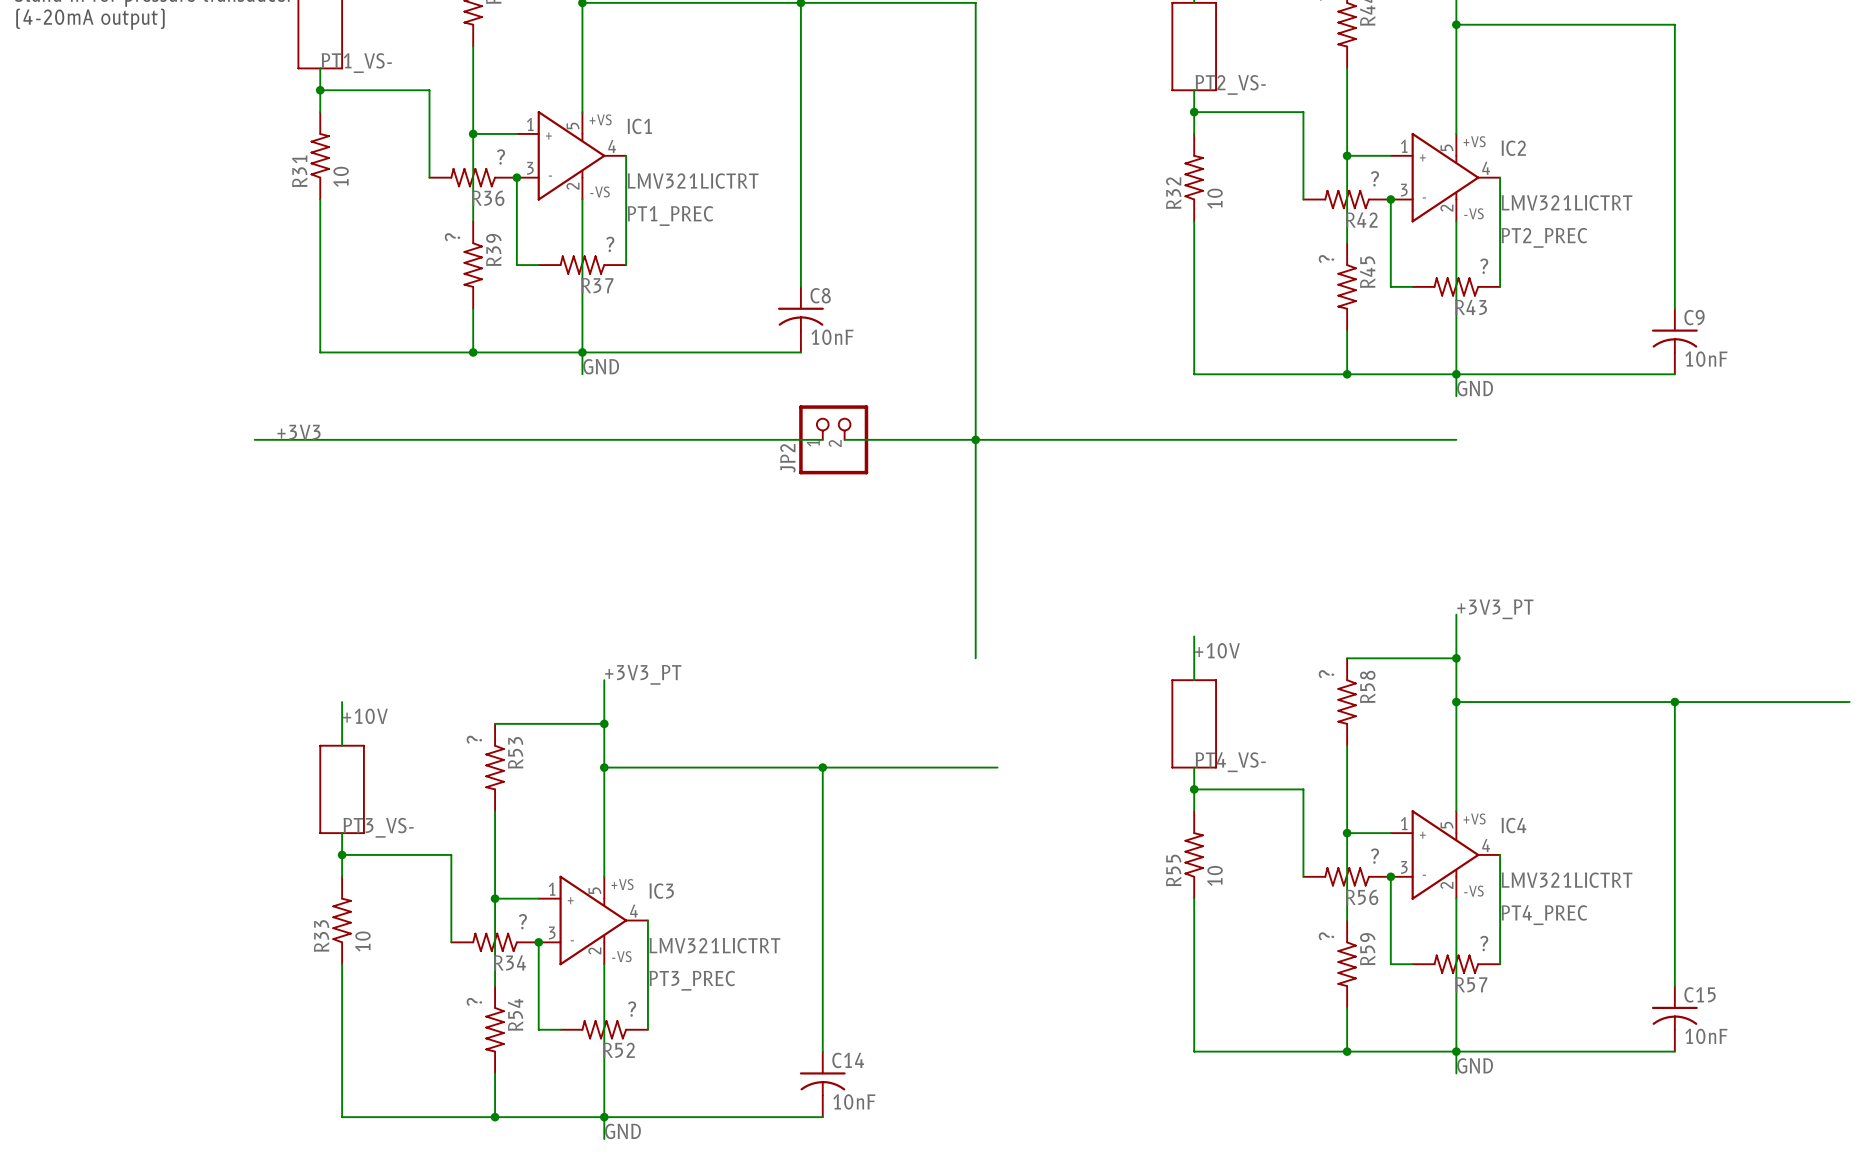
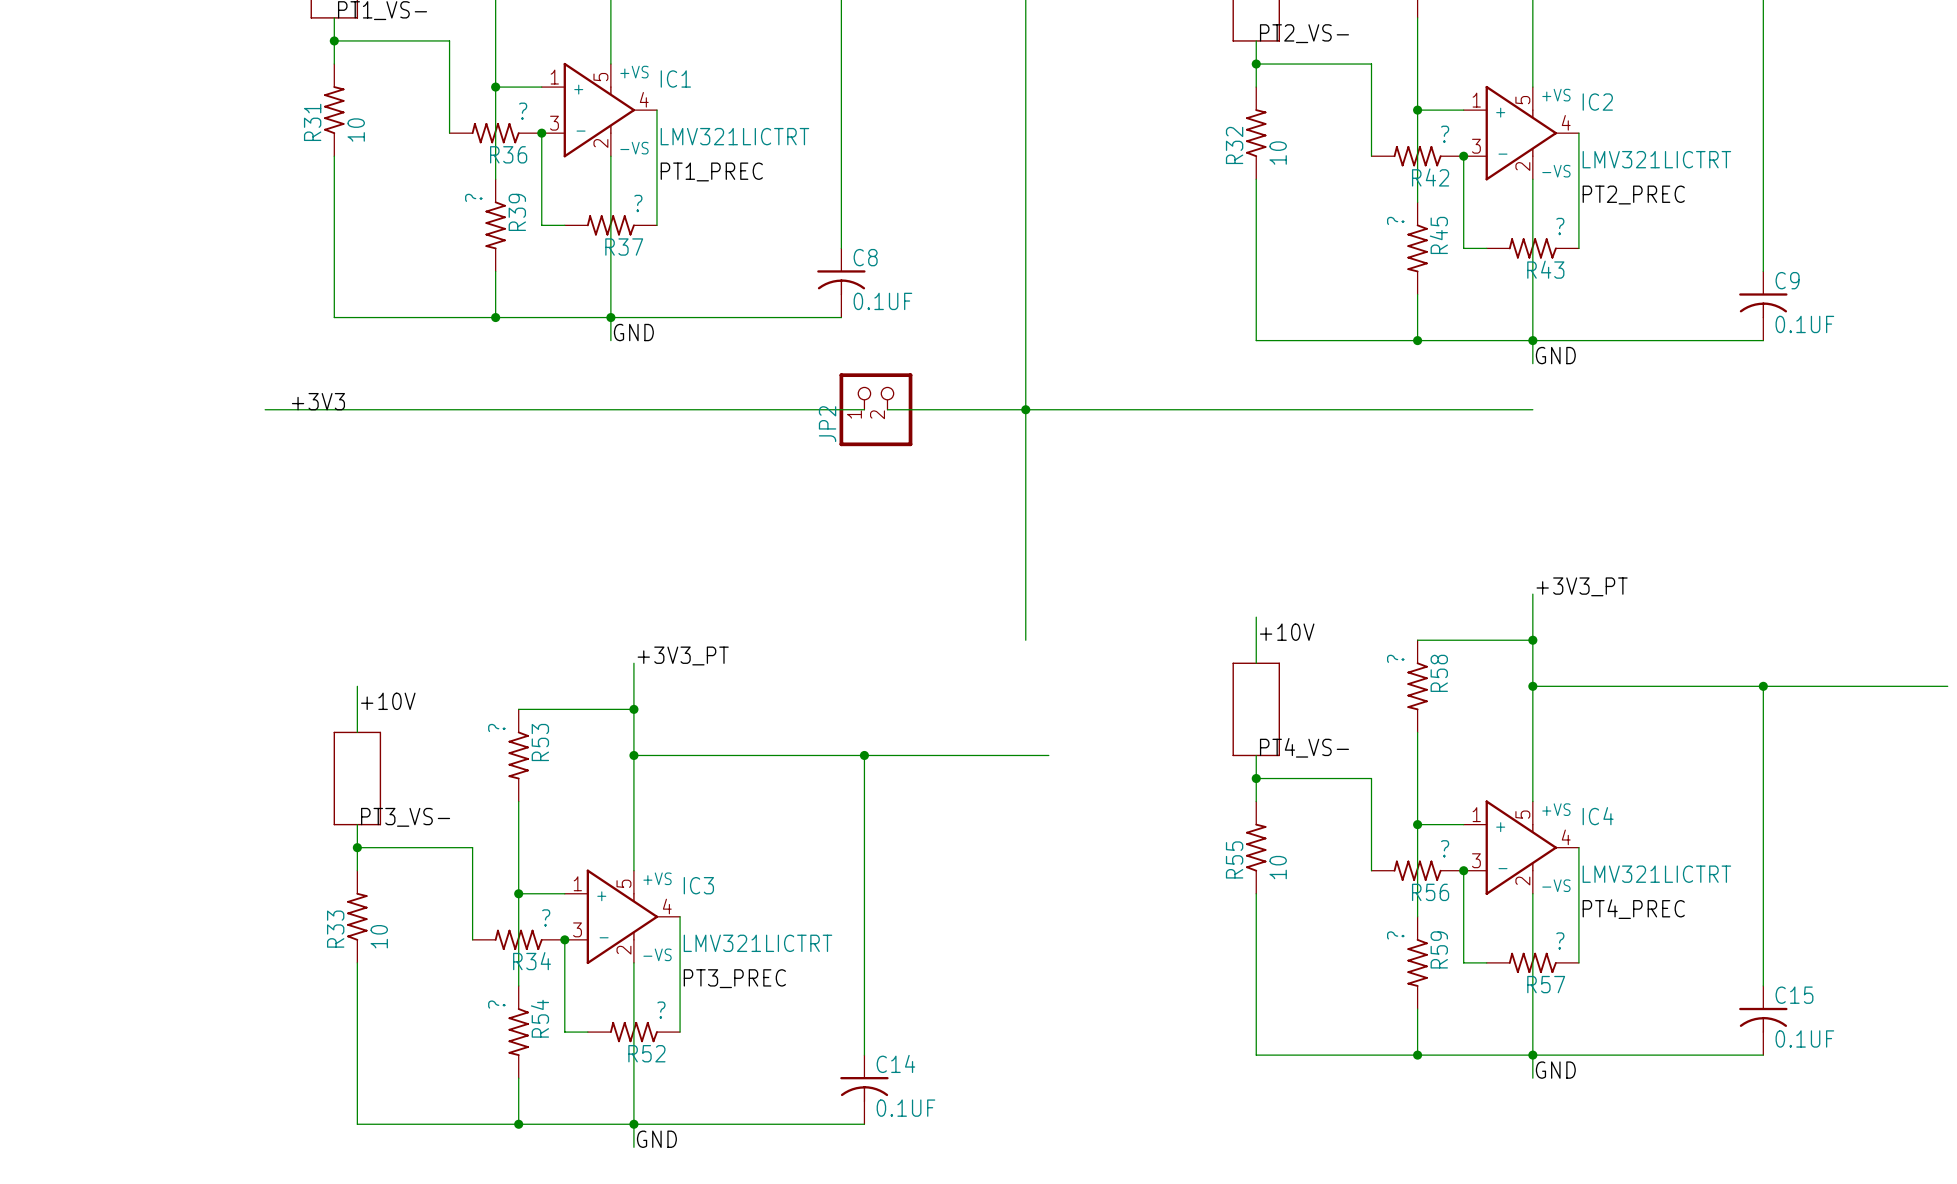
C8 value: 10nF (832, 337) -> 0.1UF (882, 301)
C9 value: 10nF (1706, 359) -> 0.1UF (1804, 324)
C15 value: 10nF (1706, 1036) -> 0.1UF (1804, 1038)
C14 value: 10nF (854, 1101) -> 0.1UF (905, 1108)

